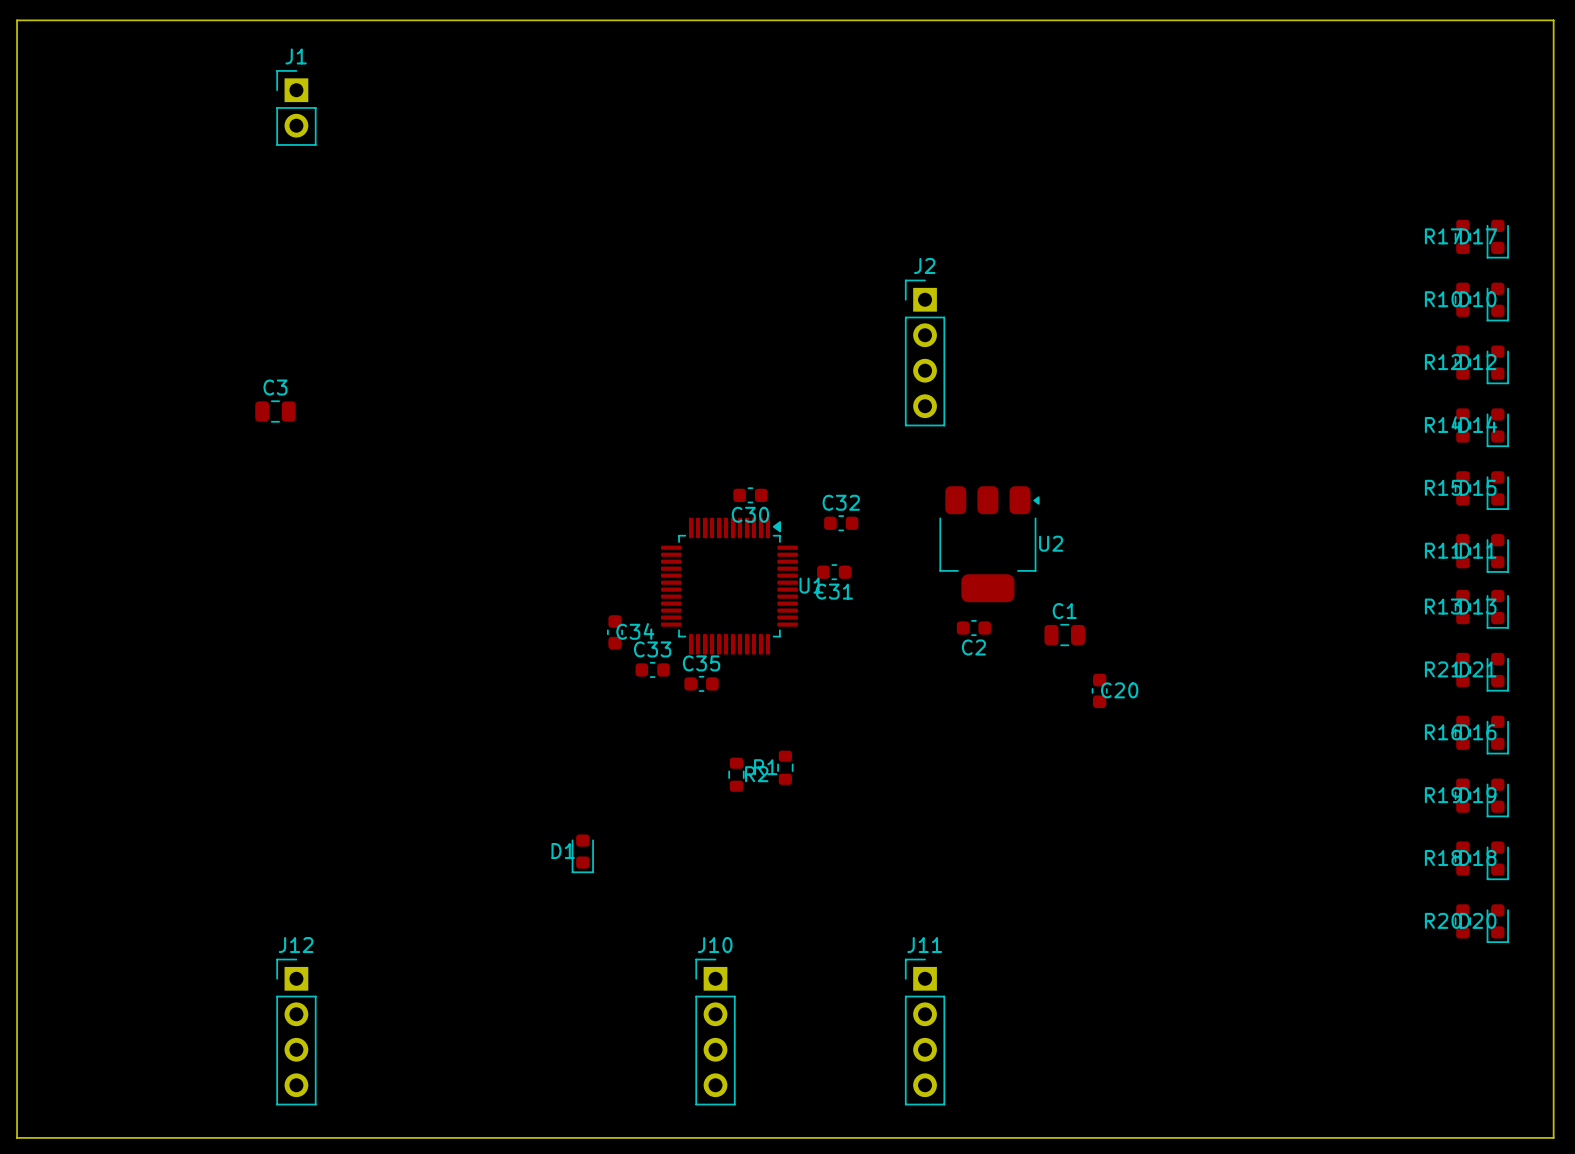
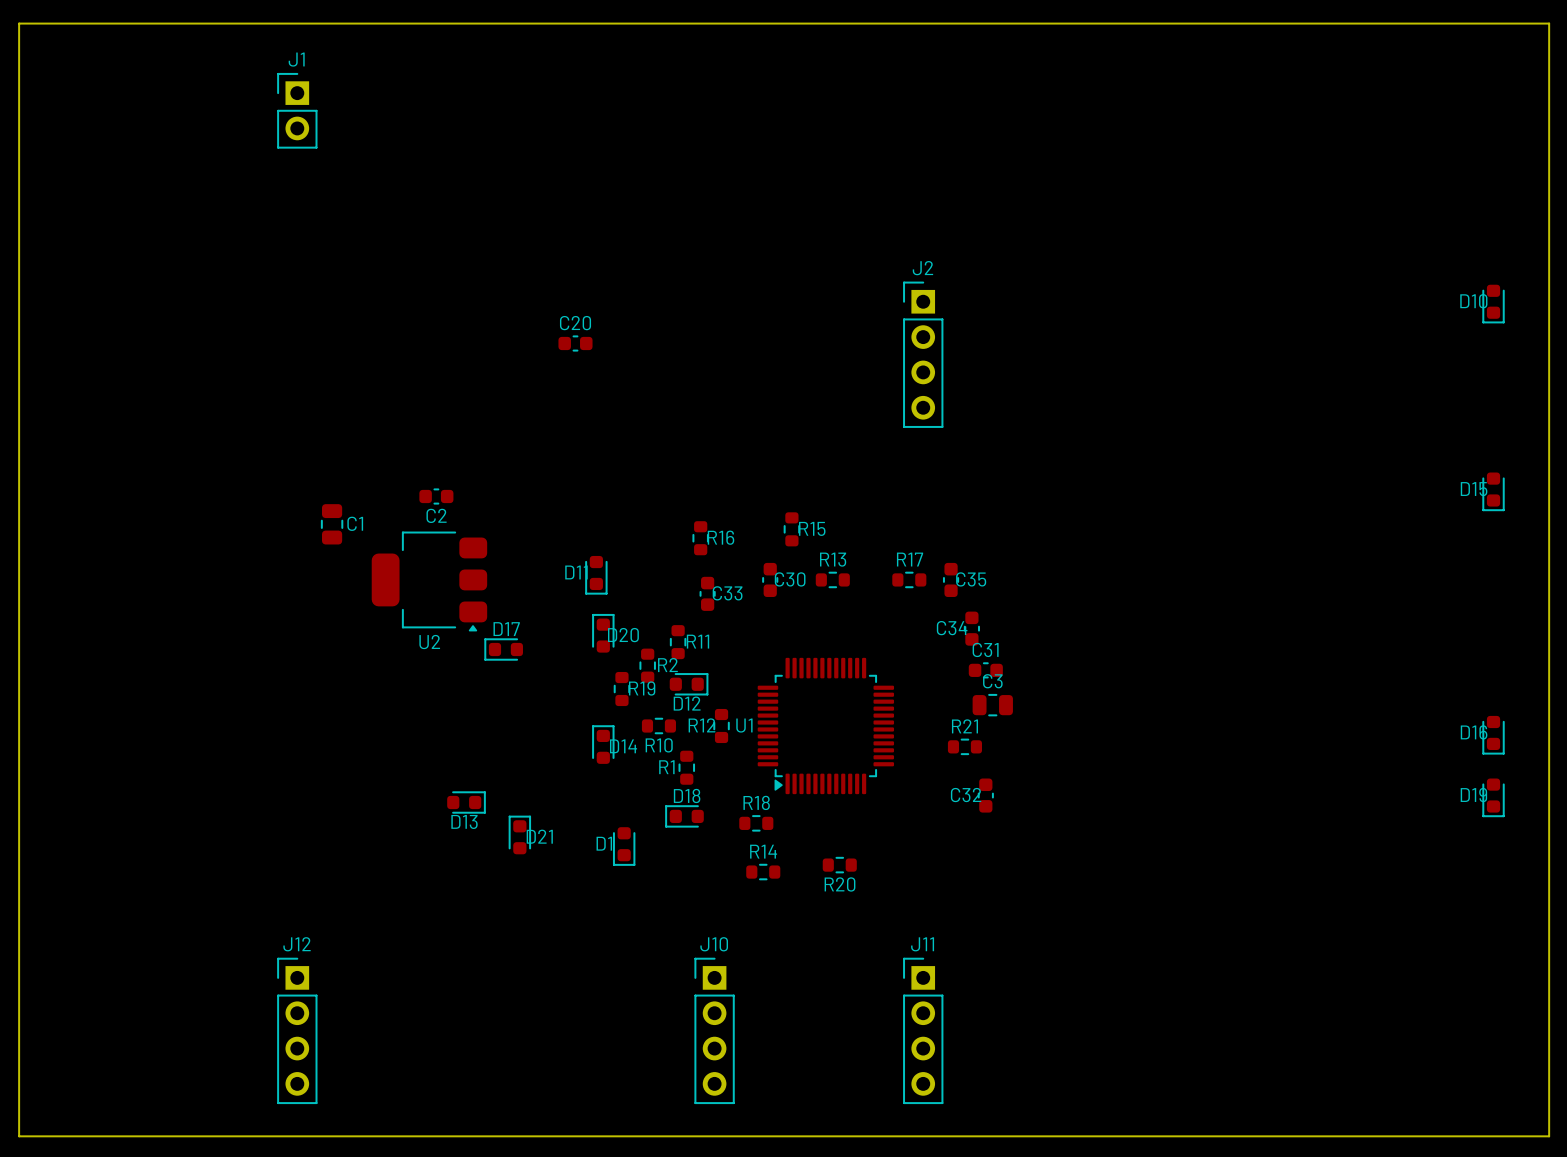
R17 rotation: 0° (1462, 236) -> 90° clockwise (909, 579)
R17 position: (1462, 236) -> (909, 579)
D17 rotation: 0° (1497, 239) -> 90° clockwise (503, 649)
D17 position: (1497, 239) -> (503, 649)
R10 name position: R10 (1443, 299) -> R10 (659, 745)
R10 rotation: 0° (1462, 299) -> 90° clockwise (658, 726)
R10 position: (1462, 299) -> (658, 726)
R12 position: (1462, 362) -> (721, 726)
D12 rotation: 0° (1497, 364) -> 90° counterclockwise (688, 684)
D12 position: (1497, 364) -> (688, 684)
C3 position: (275, 411) -> (992, 705)
R14 rotation: 0° (1462, 425) -> 90° clockwise (763, 872)
R14 position: (1462, 425) -> (763, 872)
D14 rotation: 0° (1497, 427) -> 180° (603, 744)
D14 position: (1497, 427) -> (603, 744)
R15 name position: R15 (1443, 487) -> R15 (812, 528)
R15 position: (1462, 488) -> (791, 529)
C30 rotation: 0° (750, 495) -> 90° clockwise (770, 579)
C30 position: (750, 495) -> (770, 579)
C32 name position: C32 (841, 502) -> C32 (966, 795)
C30 name position: C30 (750, 514) -> C30 (790, 579)
C32 rotation: 0° (841, 523) -> 90° clockwise (985, 795)
C32 position: (841, 523) -> (985, 795)
U2 rotation: 0° (989, 544) -> 90° clockwise (429, 581)
U2 position: (989, 544) -> (429, 581)
R11 name position: R11 (1443, 550) -> R11 (698, 641)
R11 position: (1462, 551) -> (678, 642)
D11 position: (1497, 553) -> (596, 575)
C31 position: (834, 572) -> (985, 670)
U1 rotation: 0° (729, 586) -> 180° (825, 726)
U1 position: (729, 586) -> (825, 726)
C31 name position: C31 (834, 591) -> C31 (985, 649)
R13 rotation: 0° (1462, 607) -> 90° clockwise (832, 579)
R13 position: (1462, 607) -> (832, 579)
D13 rotation: 0° (1497, 609) -> 90° counterclockwise (466, 802)
D13 position: (1497, 609) -> (466, 802)
C2 position: (973, 628) -> (436, 496)
C34 name position: C34 (635, 631) -> C34 (952, 628)
C34 position: (615, 632) -> (971, 628)
C1 rotation: 0° (1064, 635) -> 90° clockwise (332, 524)
C1 position: (1064, 635) -> (332, 524)
C33 rotation: 0° (652, 669) -> 90° clockwise (707, 593)
C33 position: (652, 669) -> (707, 593)
R21 rotation: 0° (1462, 669) -> 90° clockwise (964, 746)
R21 position: (1462, 669) -> (964, 746)
D21 rotation: 0° (1497, 672) -> 180° (519, 835)
D21 position: (1497, 672) -> (519, 835)
C35 rotation: 0° (701, 683) -> 90° clockwise (951, 579)
C35 position: (701, 683) -> (951, 579)
C20 rotation: 0° (1099, 690) -> 90° clockwise (575, 343)
C20 position: (1099, 690) -> (575, 343)
C20 name position: C20 (1119, 690) -> C20 (575, 323)
R16 name position: R16 (1443, 732) -> R16 (721, 537)
R16 position: (1462, 732) -> (700, 538)
R1 position: (785, 767) -> (686, 767)
R2 position: (736, 774) -> (647, 665)
R19 name position: R19 (1443, 795) -> R19 (642, 688)
R19 position: (1462, 795) -> (621, 689)
D1 position: (582, 853) -> (624, 846)
R18 rotation: 0° (1462, 858) -> 90° clockwise (756, 823)
R18 position: (1462, 858) -> (756, 823)
D18 rotation: 0° (1497, 860) -> 90° clockwise (684, 816)
D18 position: (1497, 860) -> (684, 816)
R20 name position: R20 (1443, 920) -> R20 (840, 884)
R20 rotation: 0° (1462, 921) -> 90° clockwise (839, 865)
R20 position: (1462, 921) -> (839, 865)
D20 rotation: 0° (1497, 923) -> 180° (603, 633)
D20 position: (1497, 923) -> (603, 633)

